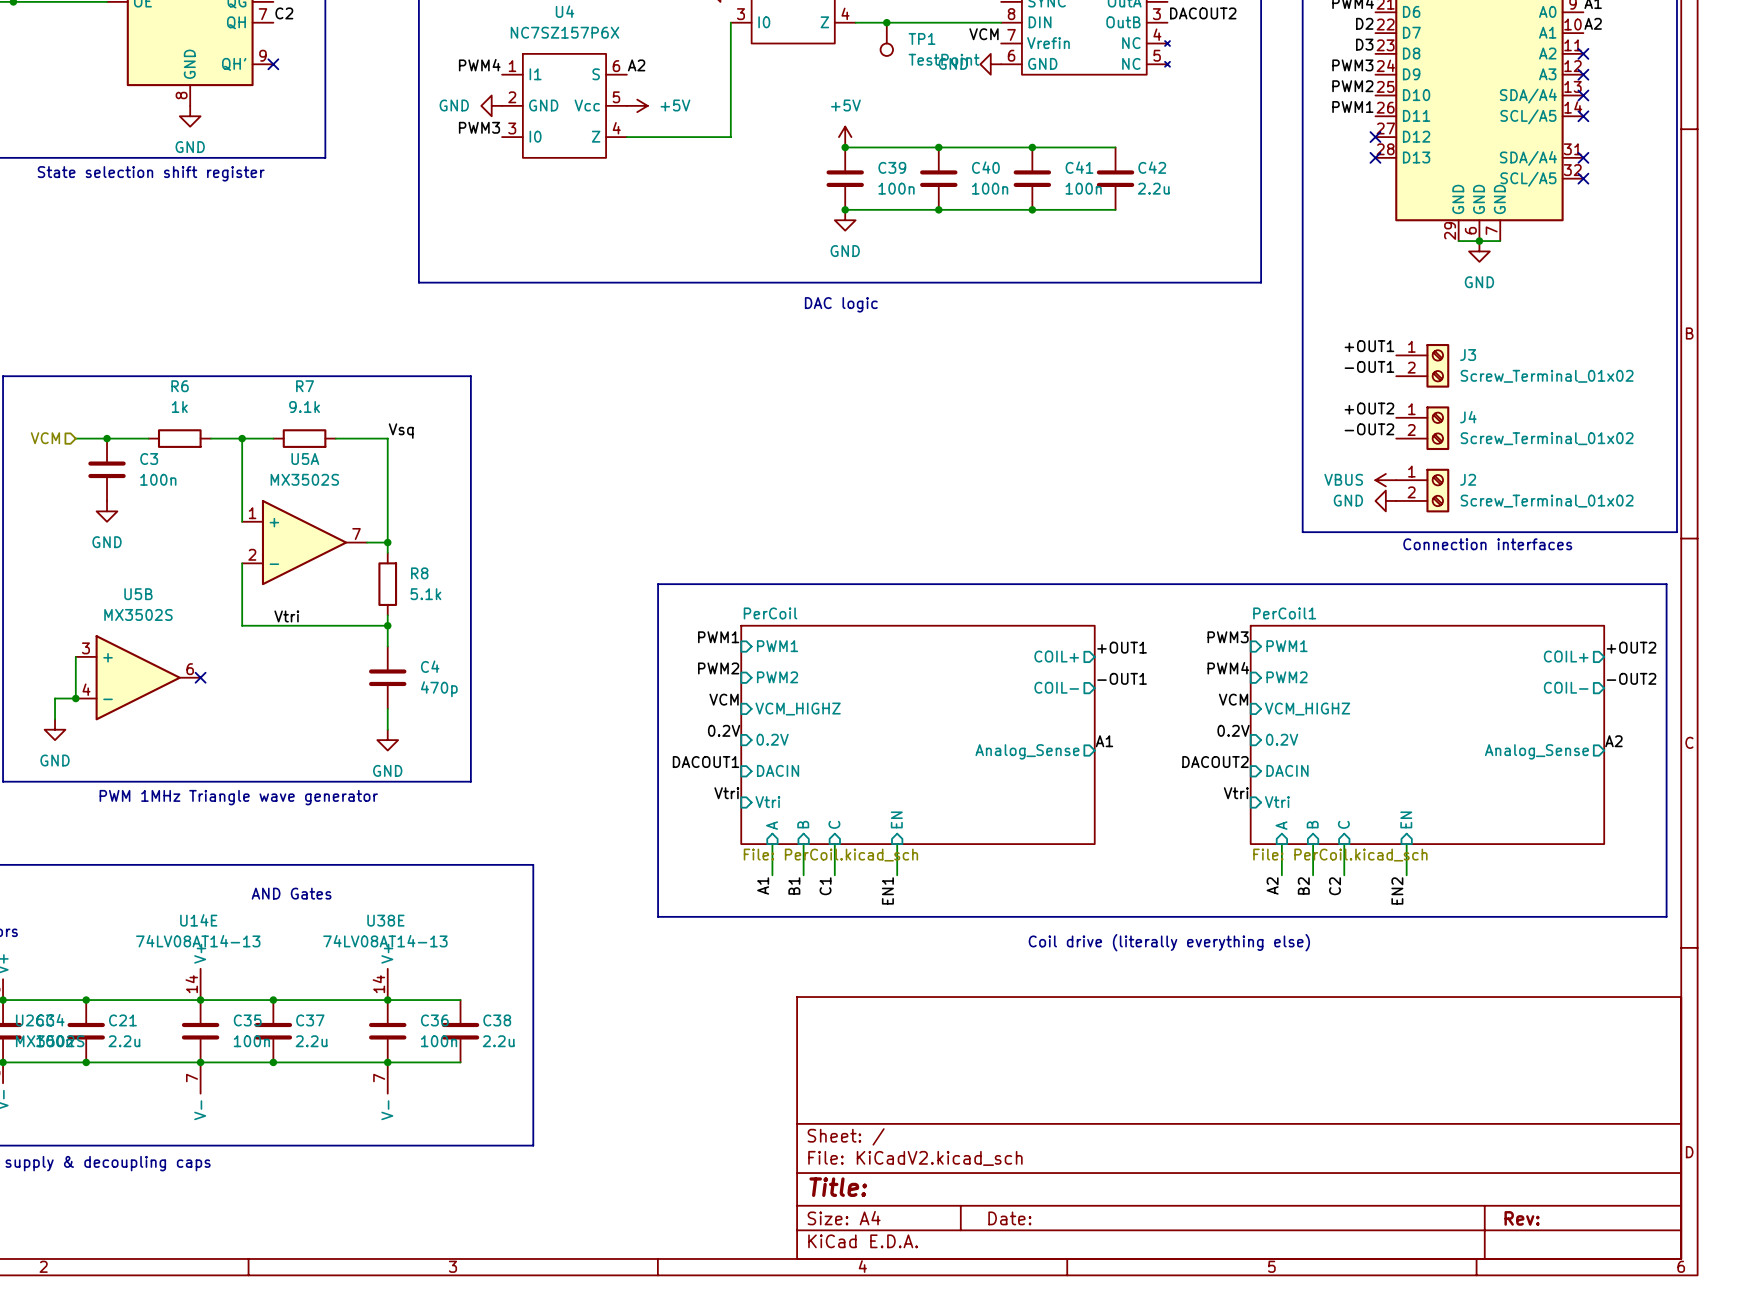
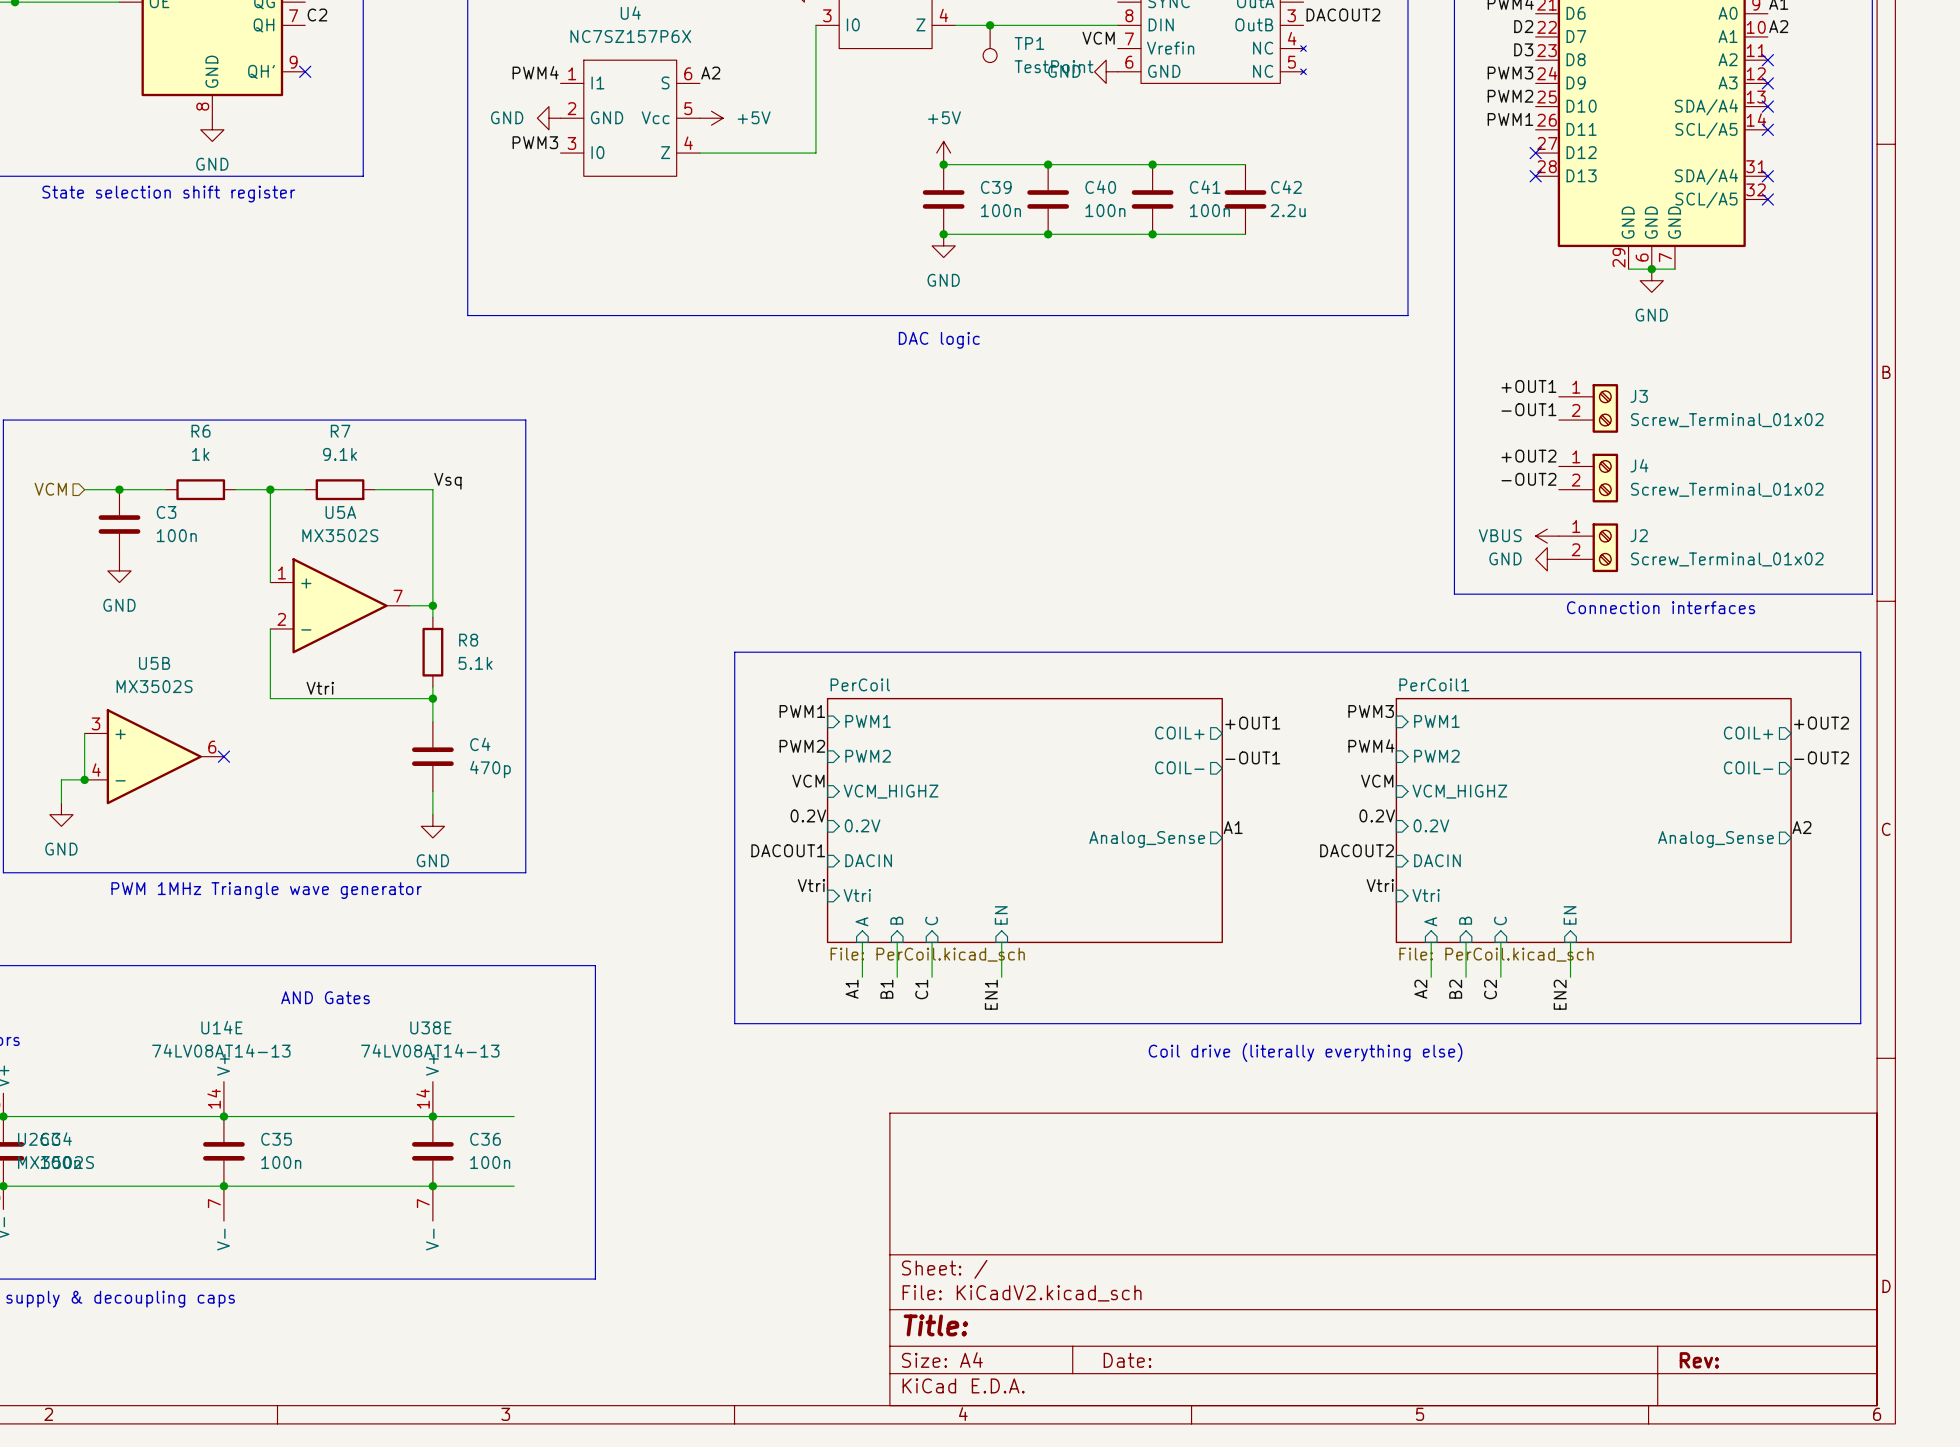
junction: (86, 1000) -> none
junction: (273, 1000) -> none
C21: 2.2u (86, 1031) -> none
C37: 2.2u (273, 1031) -> none
C38: 2.2u (460, 1031) -> none
junction: (86, 1062) -> none
junction: (273, 1062) -> none

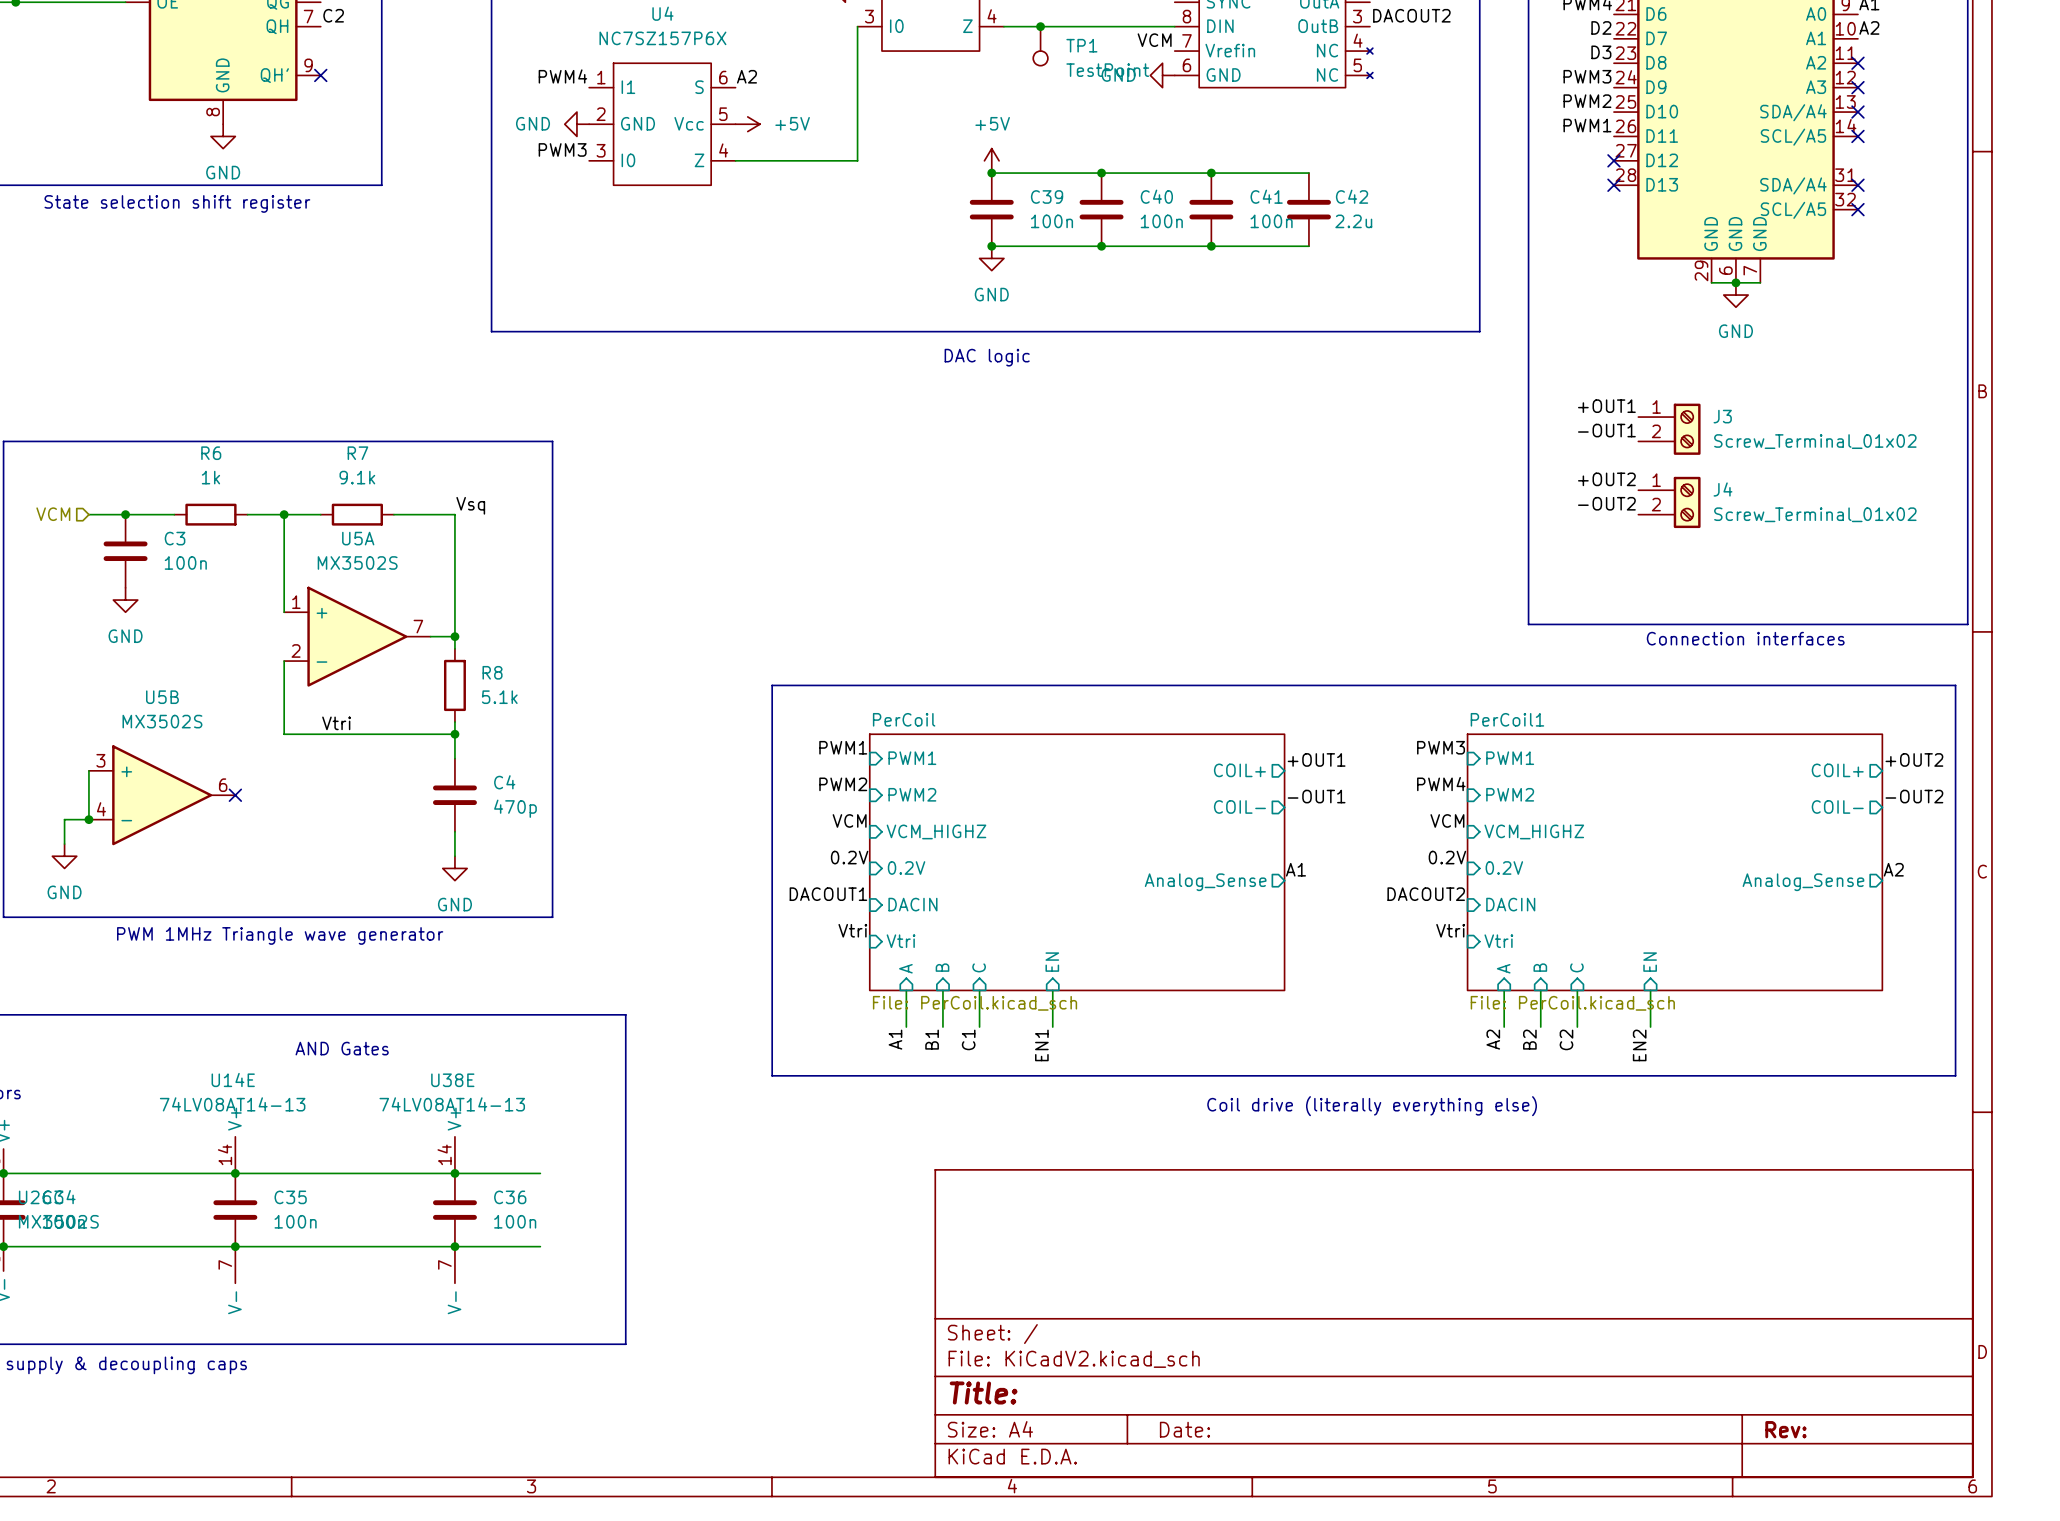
power symbol: VBUS (1547, 536) -> none
J2: Screw_Terminal_01x02 (1588, 547) -> none
power symbol: GND (1547, 559) -> none

